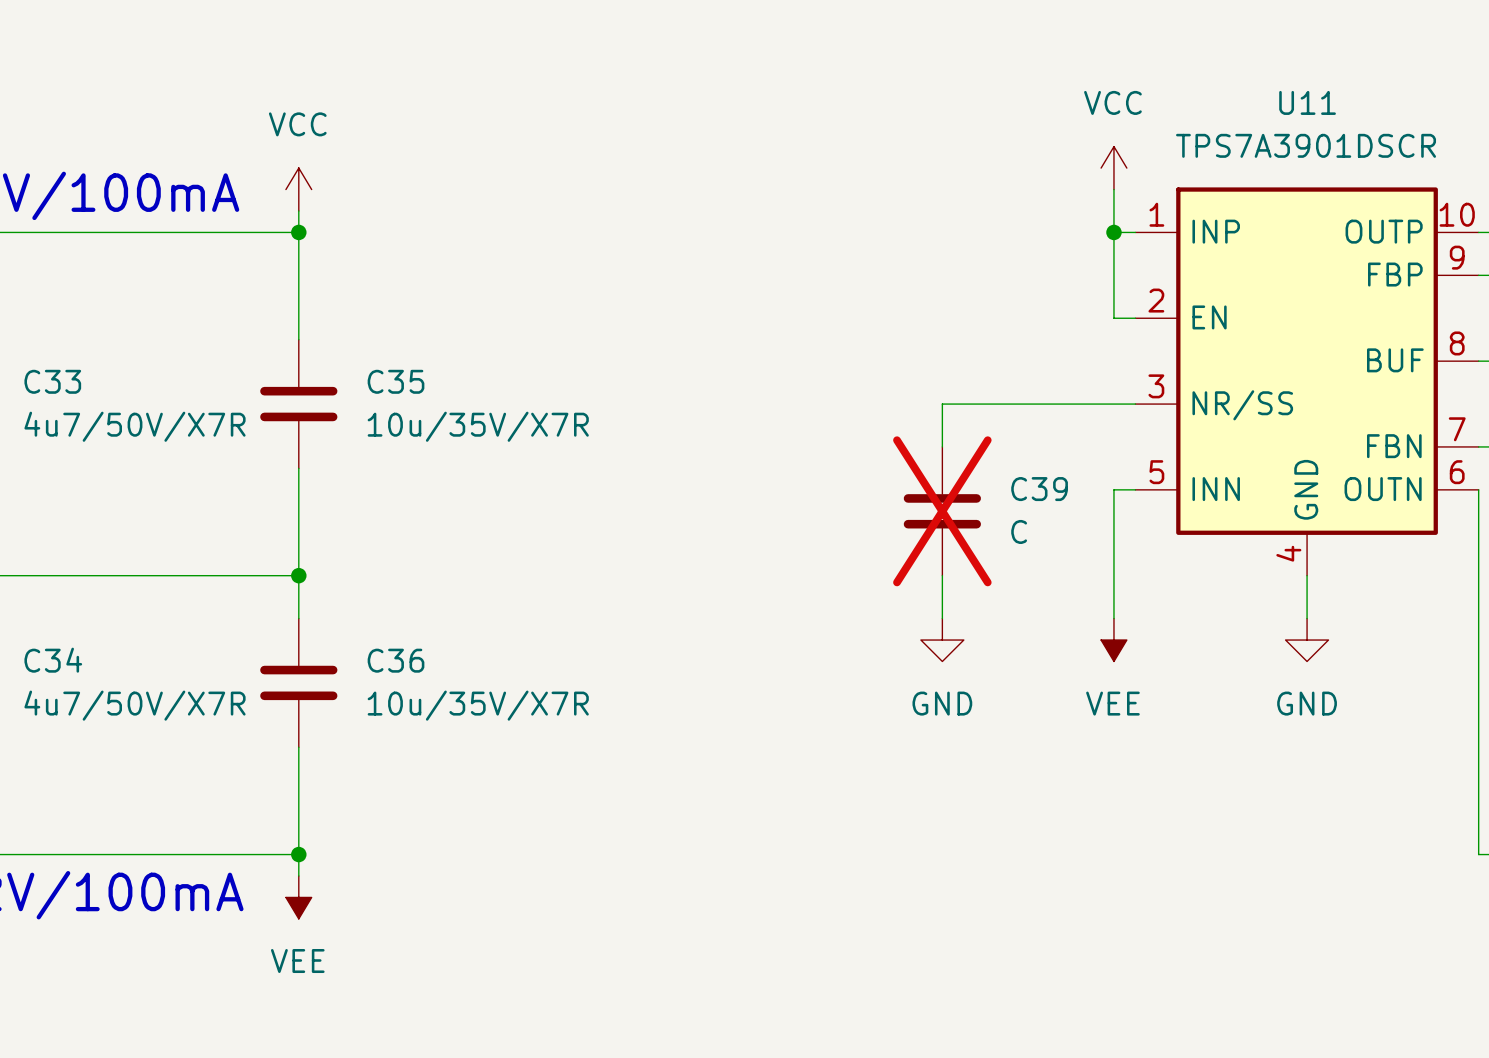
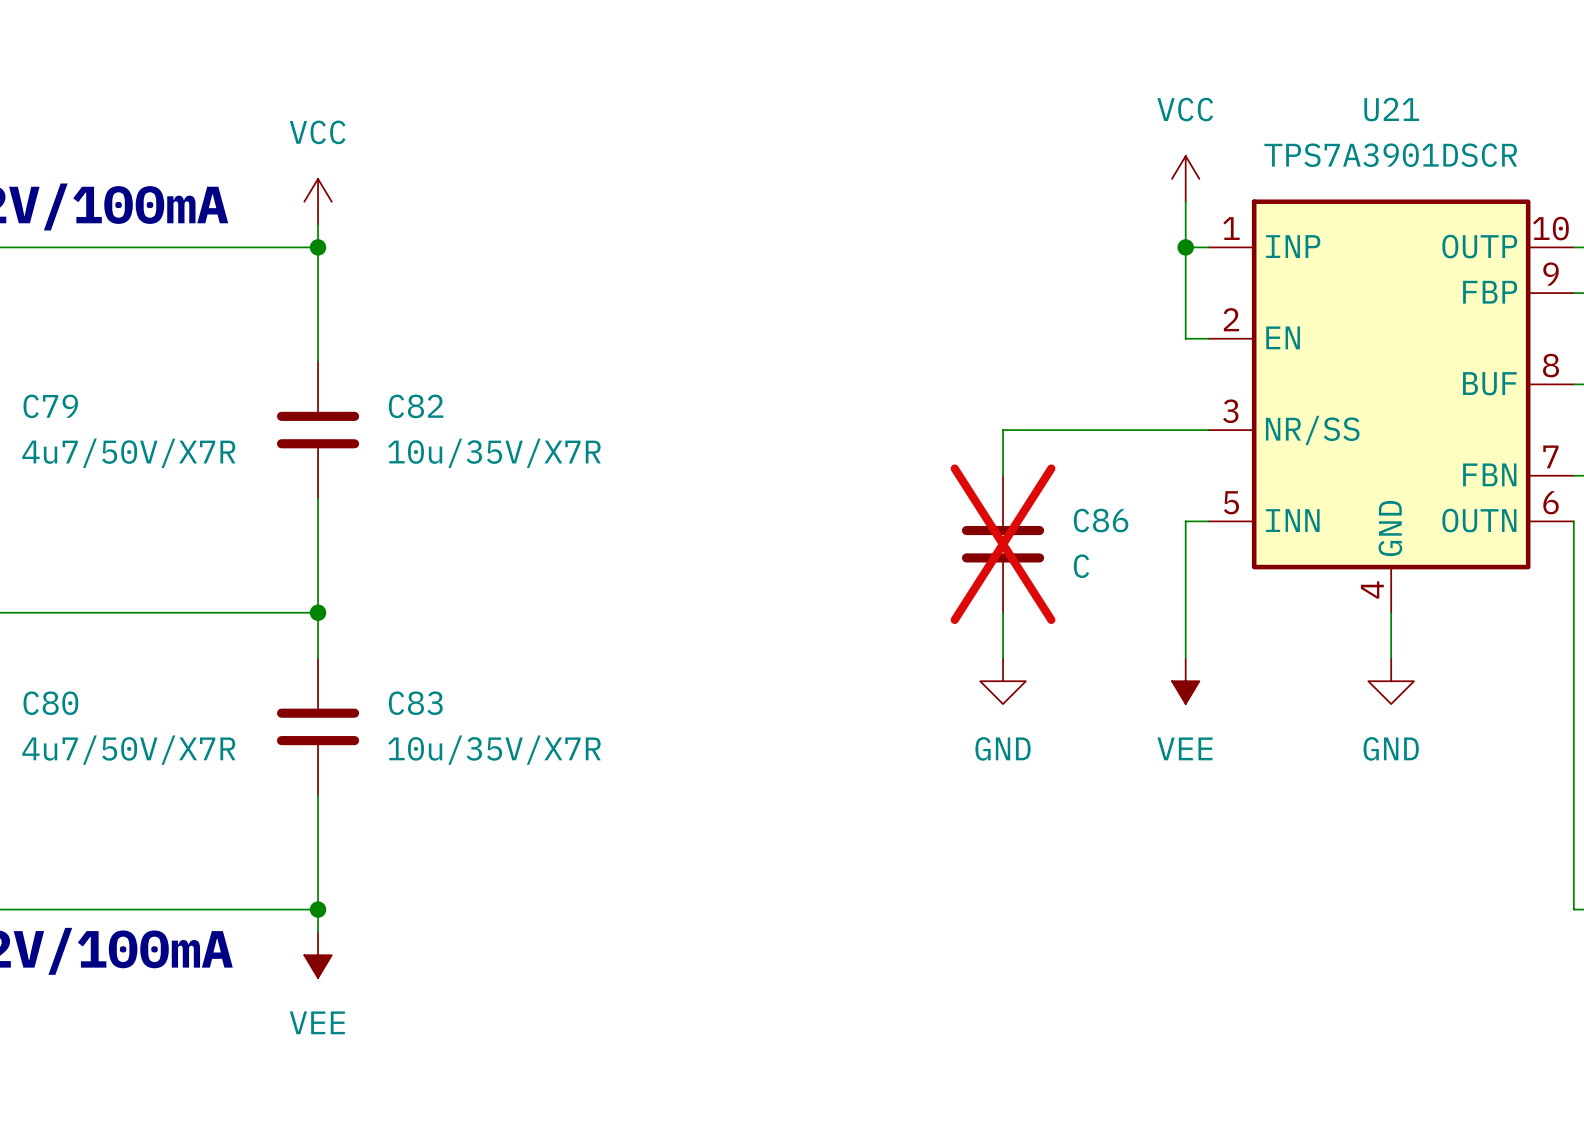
U11 name: U11 (1307, 102) -> U21 (1391, 109)
C33 name: C33 (52, 381) -> C79 (50, 406)
C35 name: C35 (396, 381) -> C82 (416, 406)
C39 name: C39 (1039, 489) -> C86 (1101, 520)
C34 name: C34 (53, 660) -> C80 (50, 703)
C36 name: C36 (396, 660) -> C83 (415, 703)

